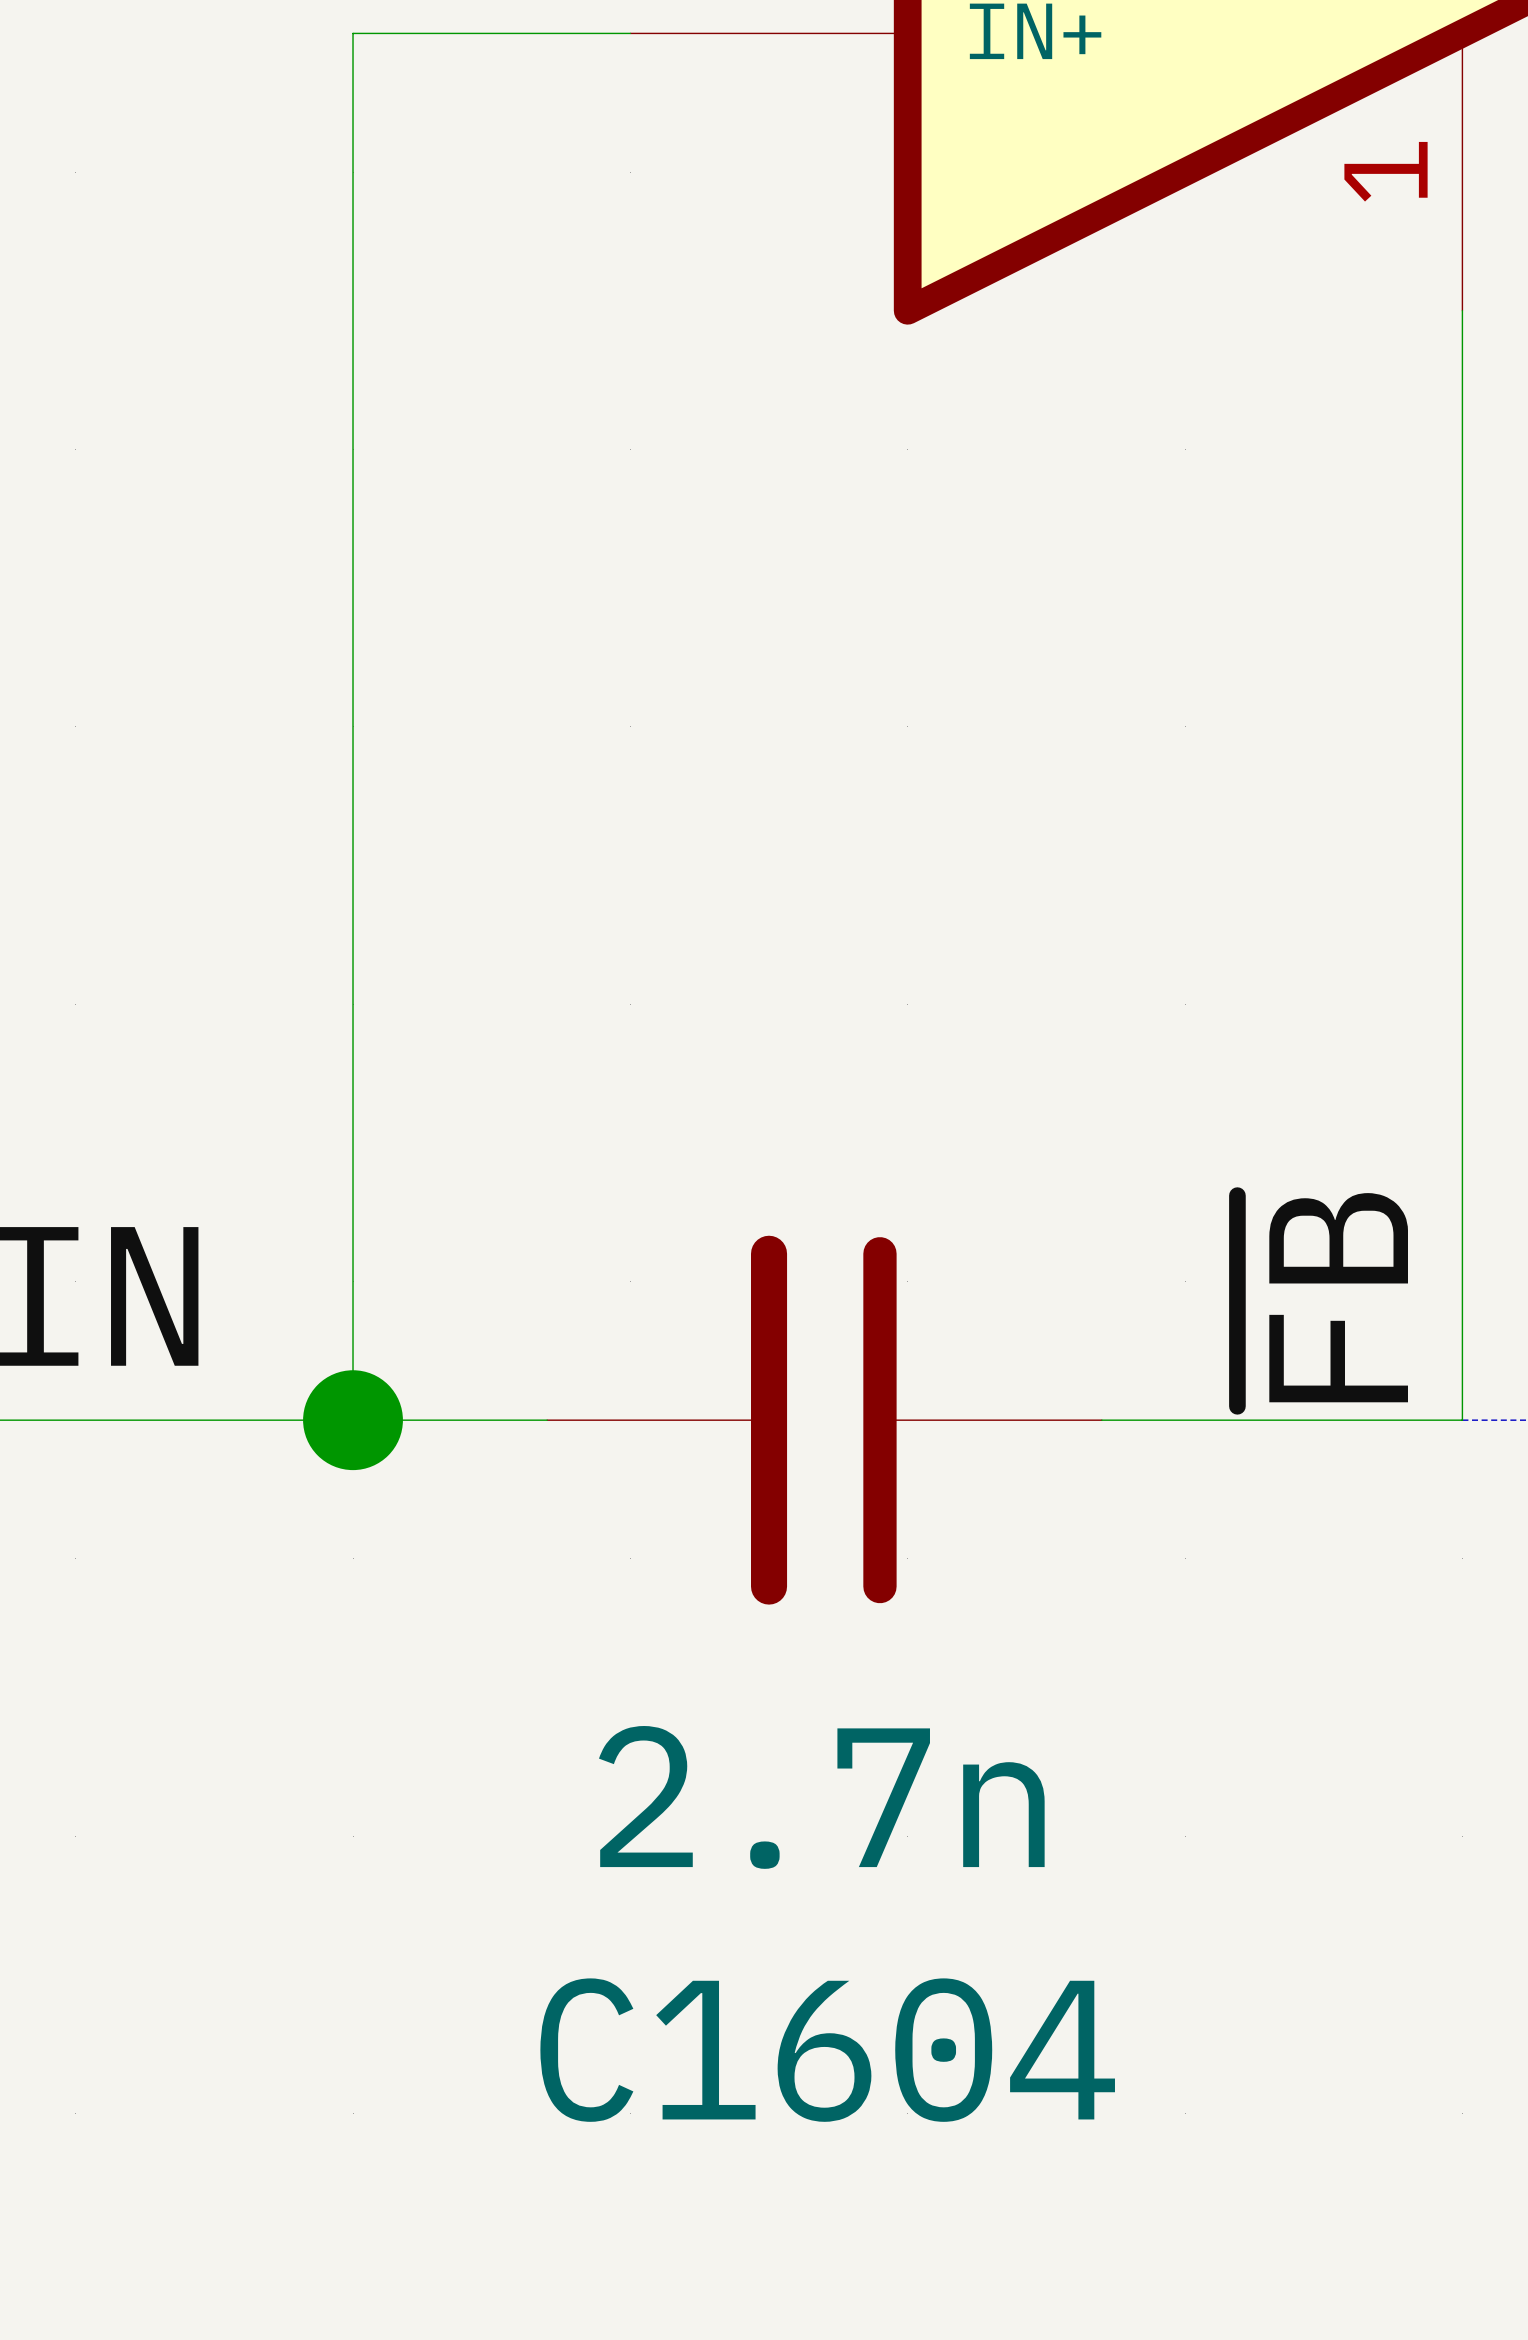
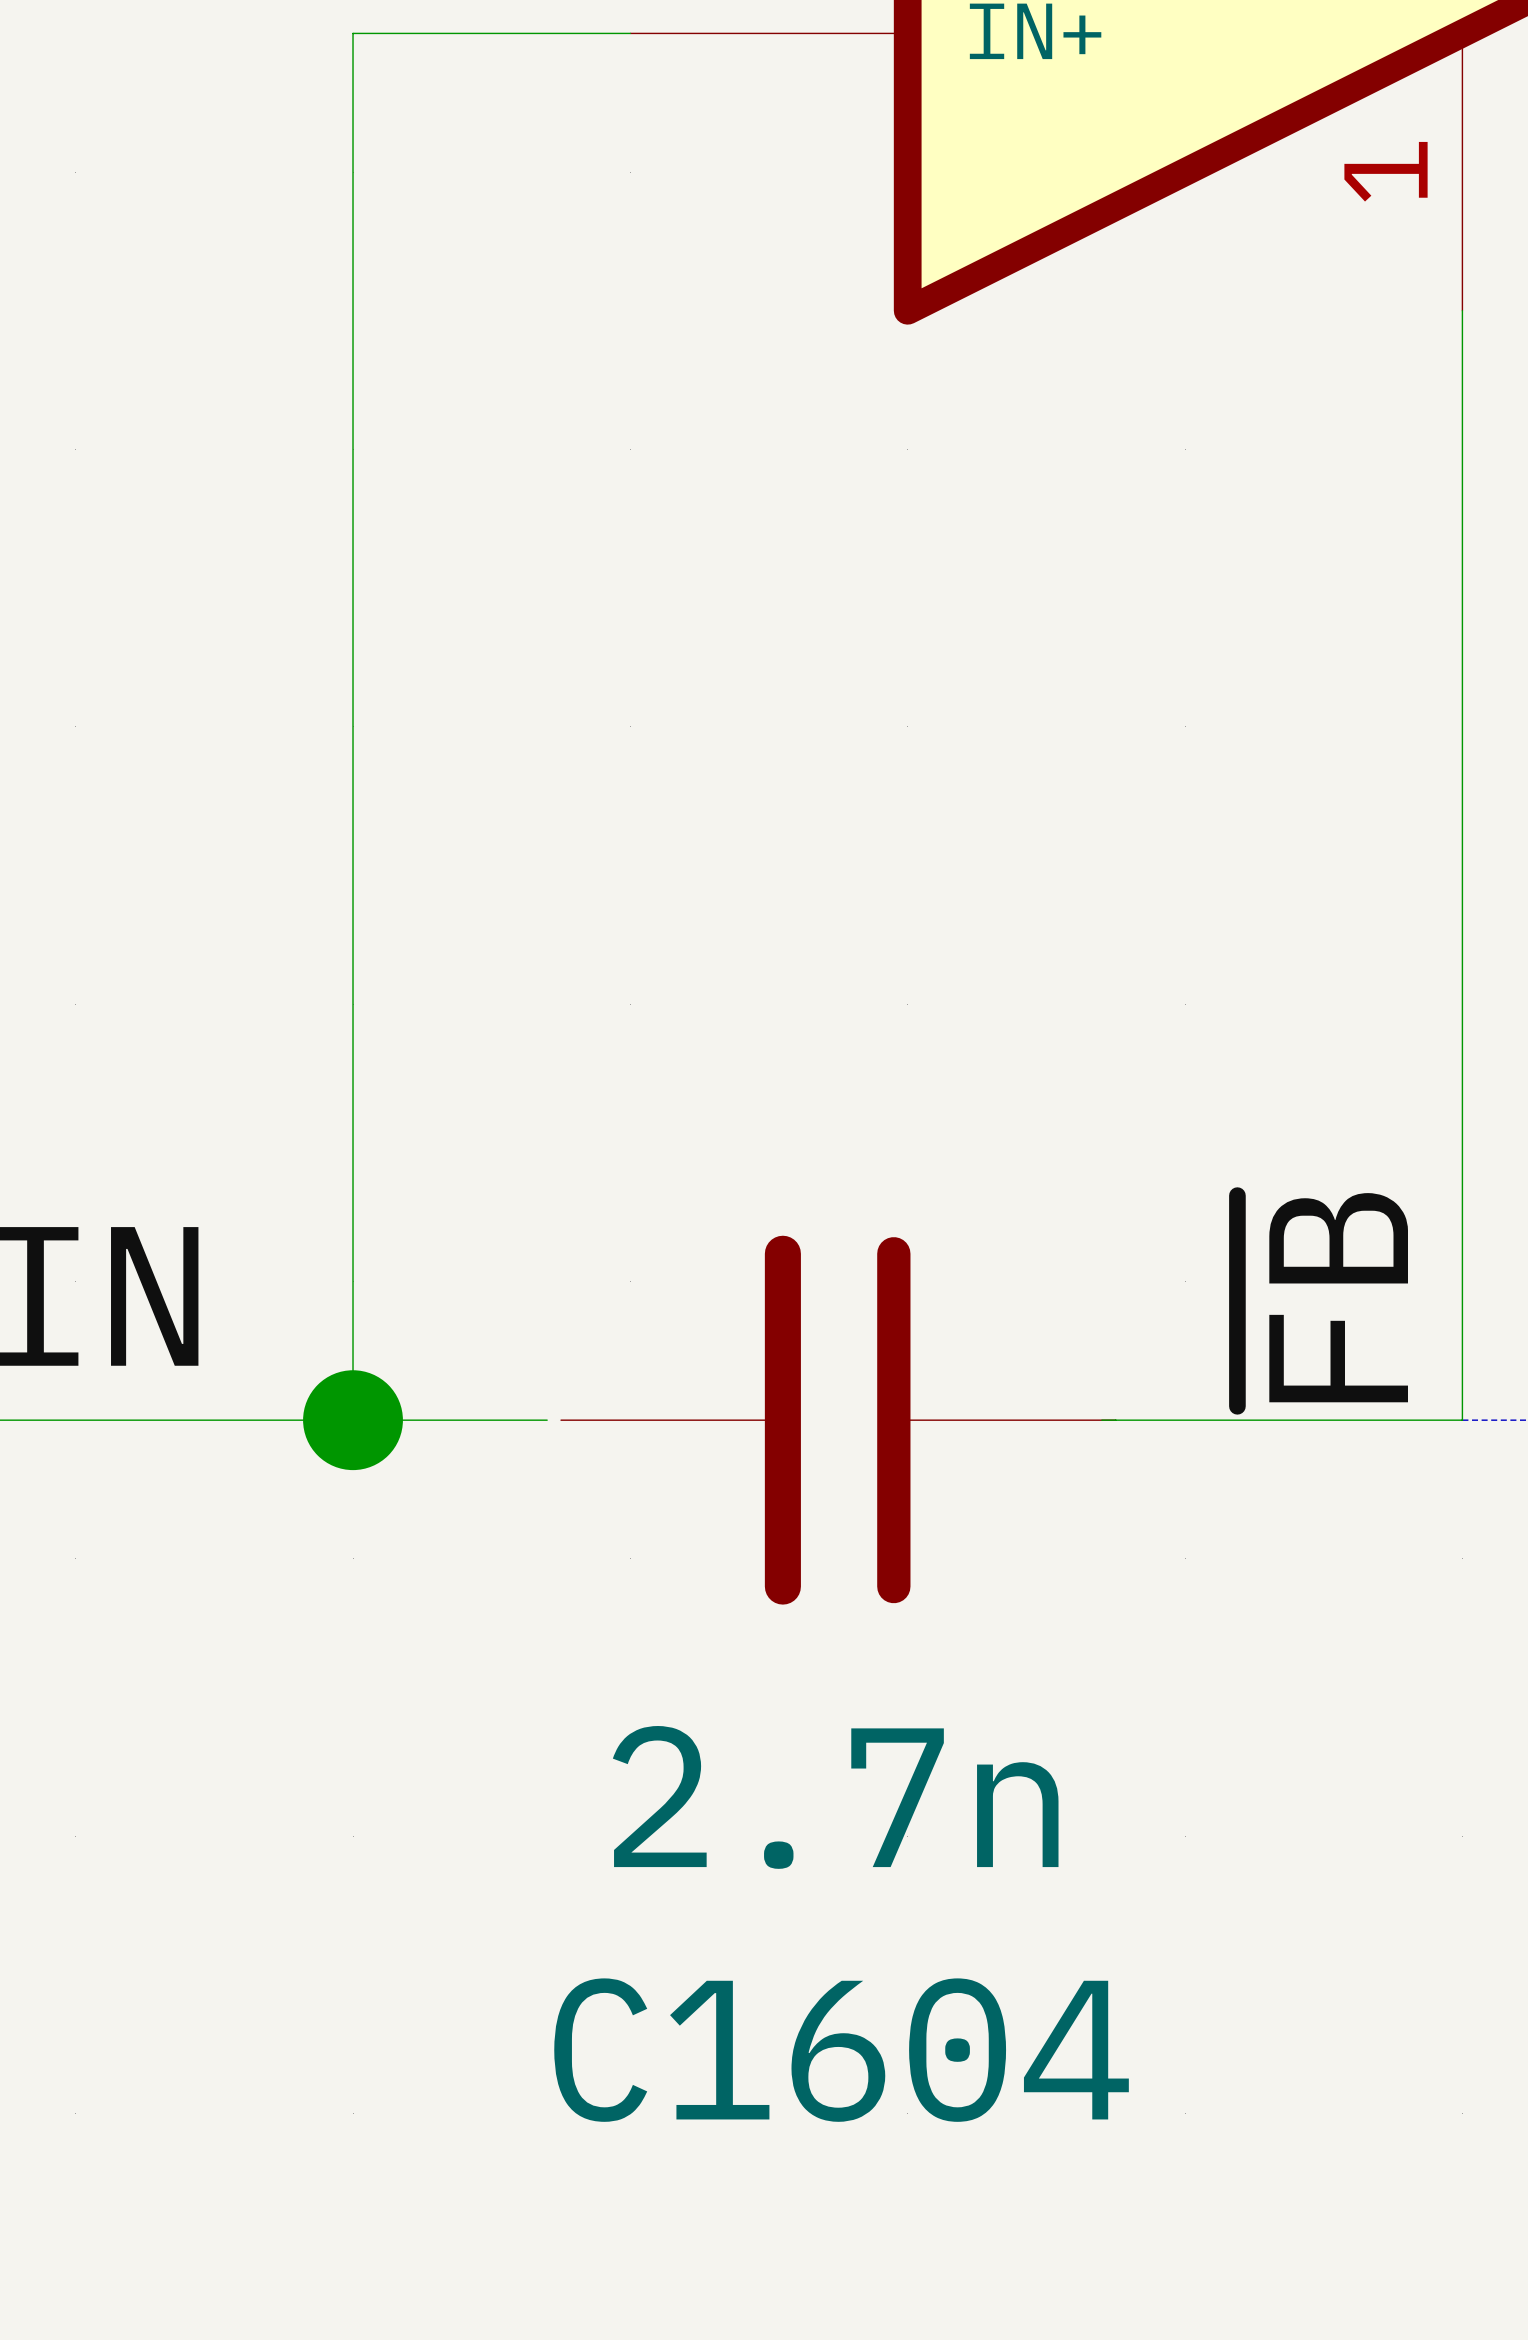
C1604 position: (824, 1420) -> (838, 1420)

